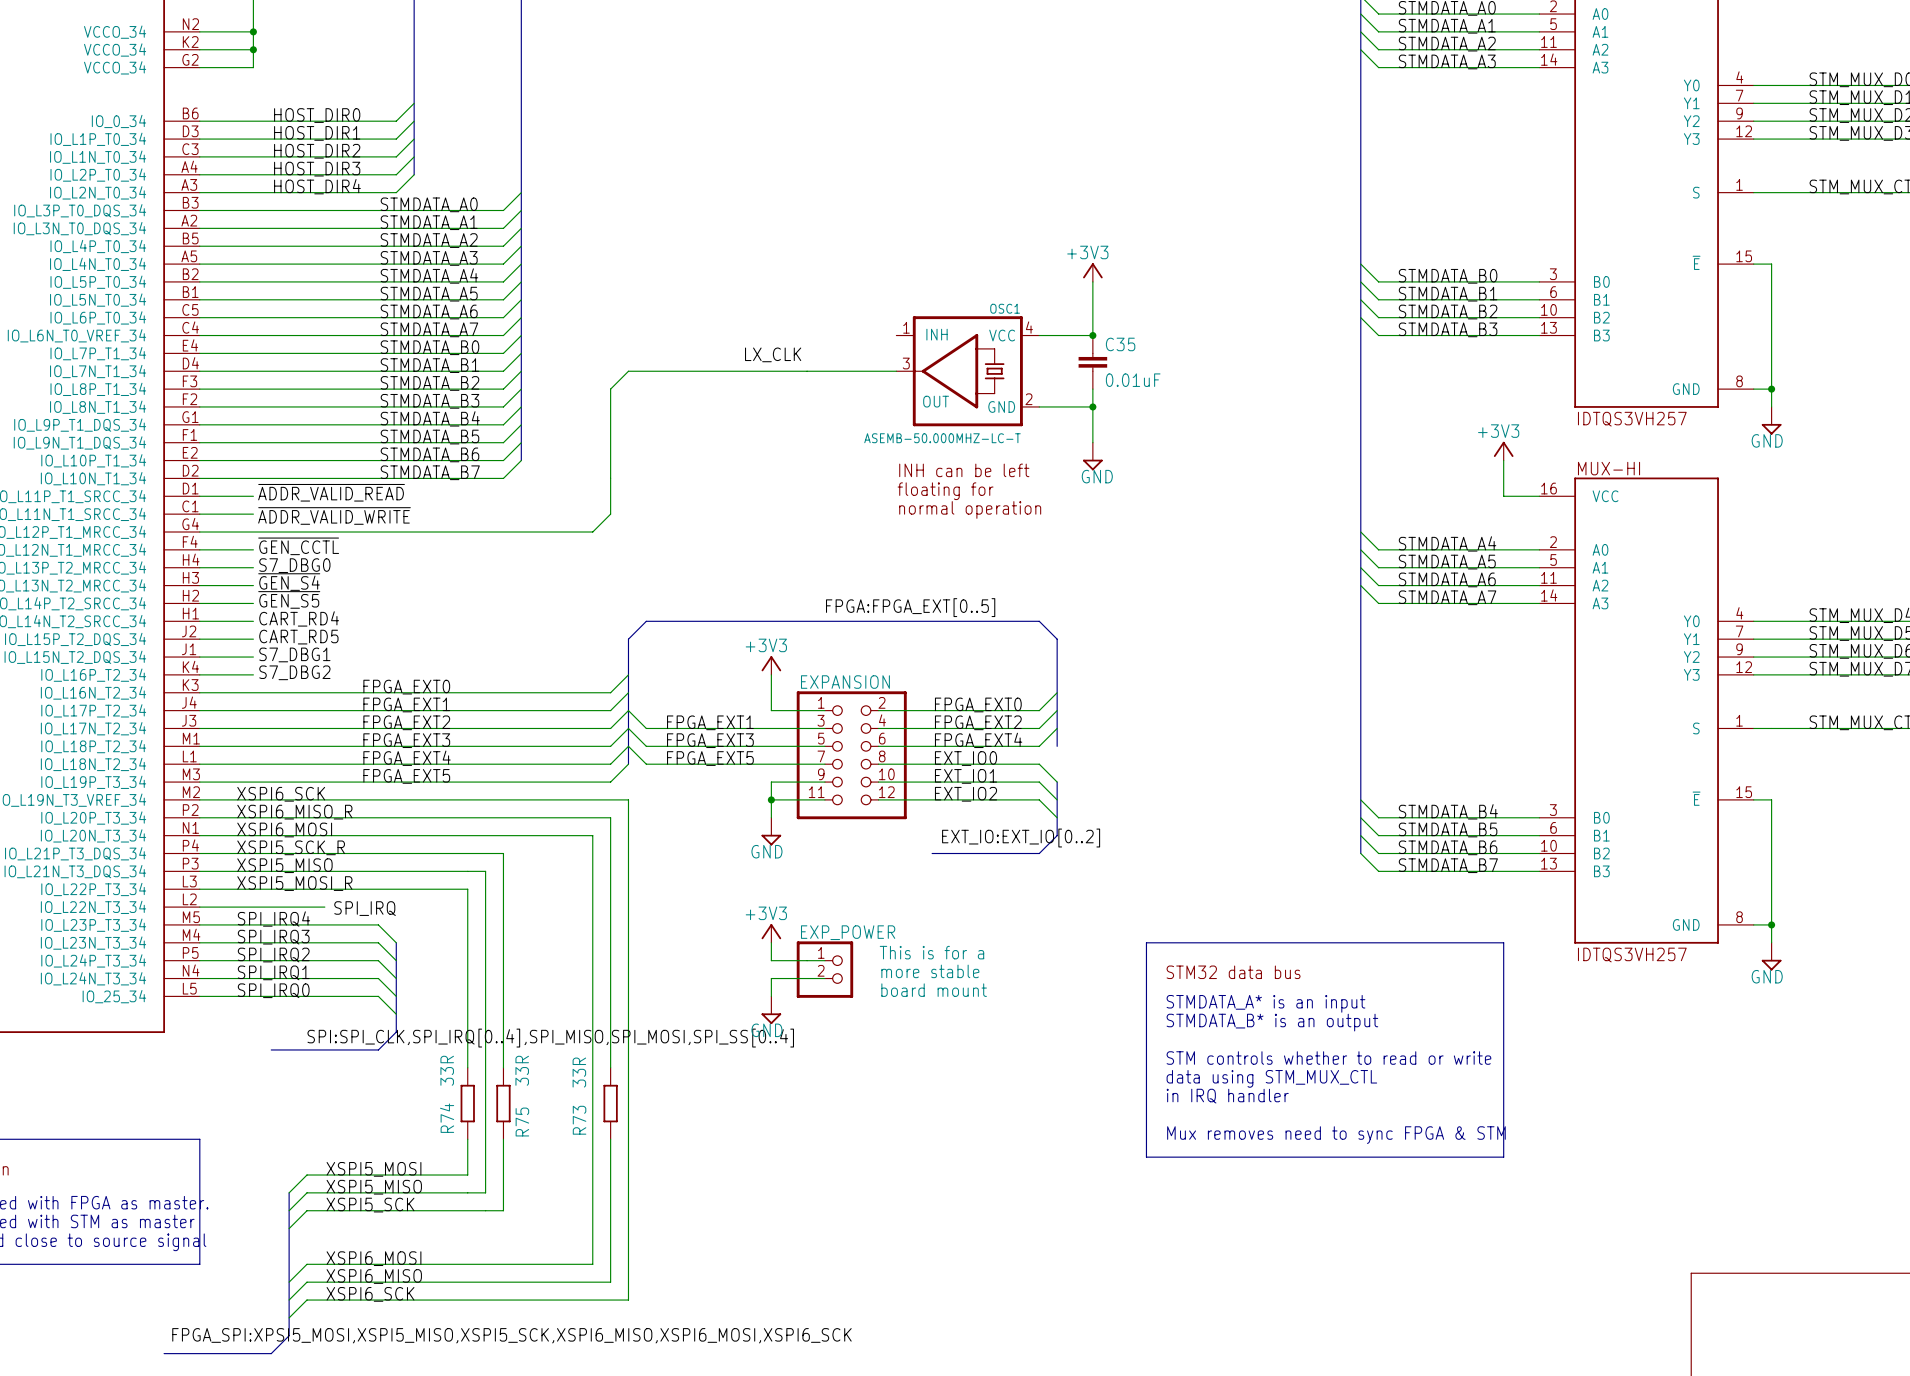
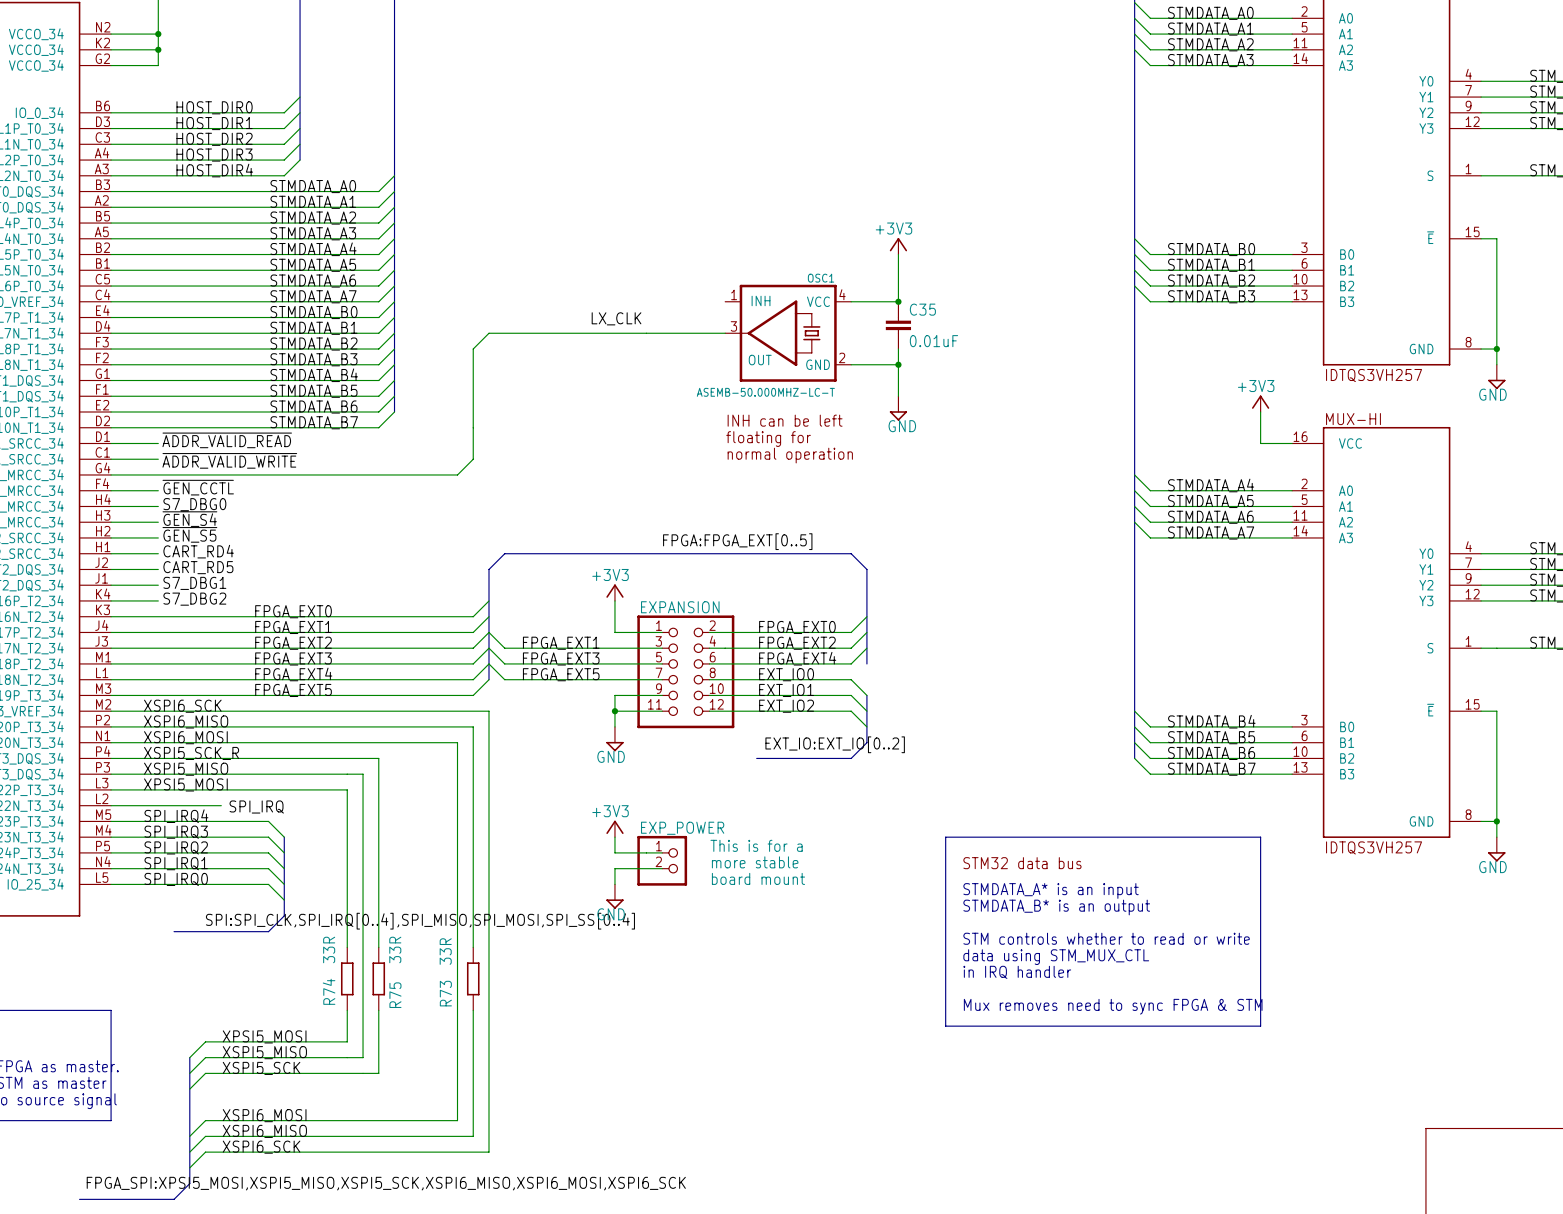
label: XSPI6_MISO_R (294, 812) -> XSPI6_MISO (186, 721)
label: XSPI5_MOSI_R (294, 883) -> XPSI5_MOSI (185, 784)
label: XSPI5_MOSI (373, 1169) -> XPSI5_MOSI (264, 1036)

